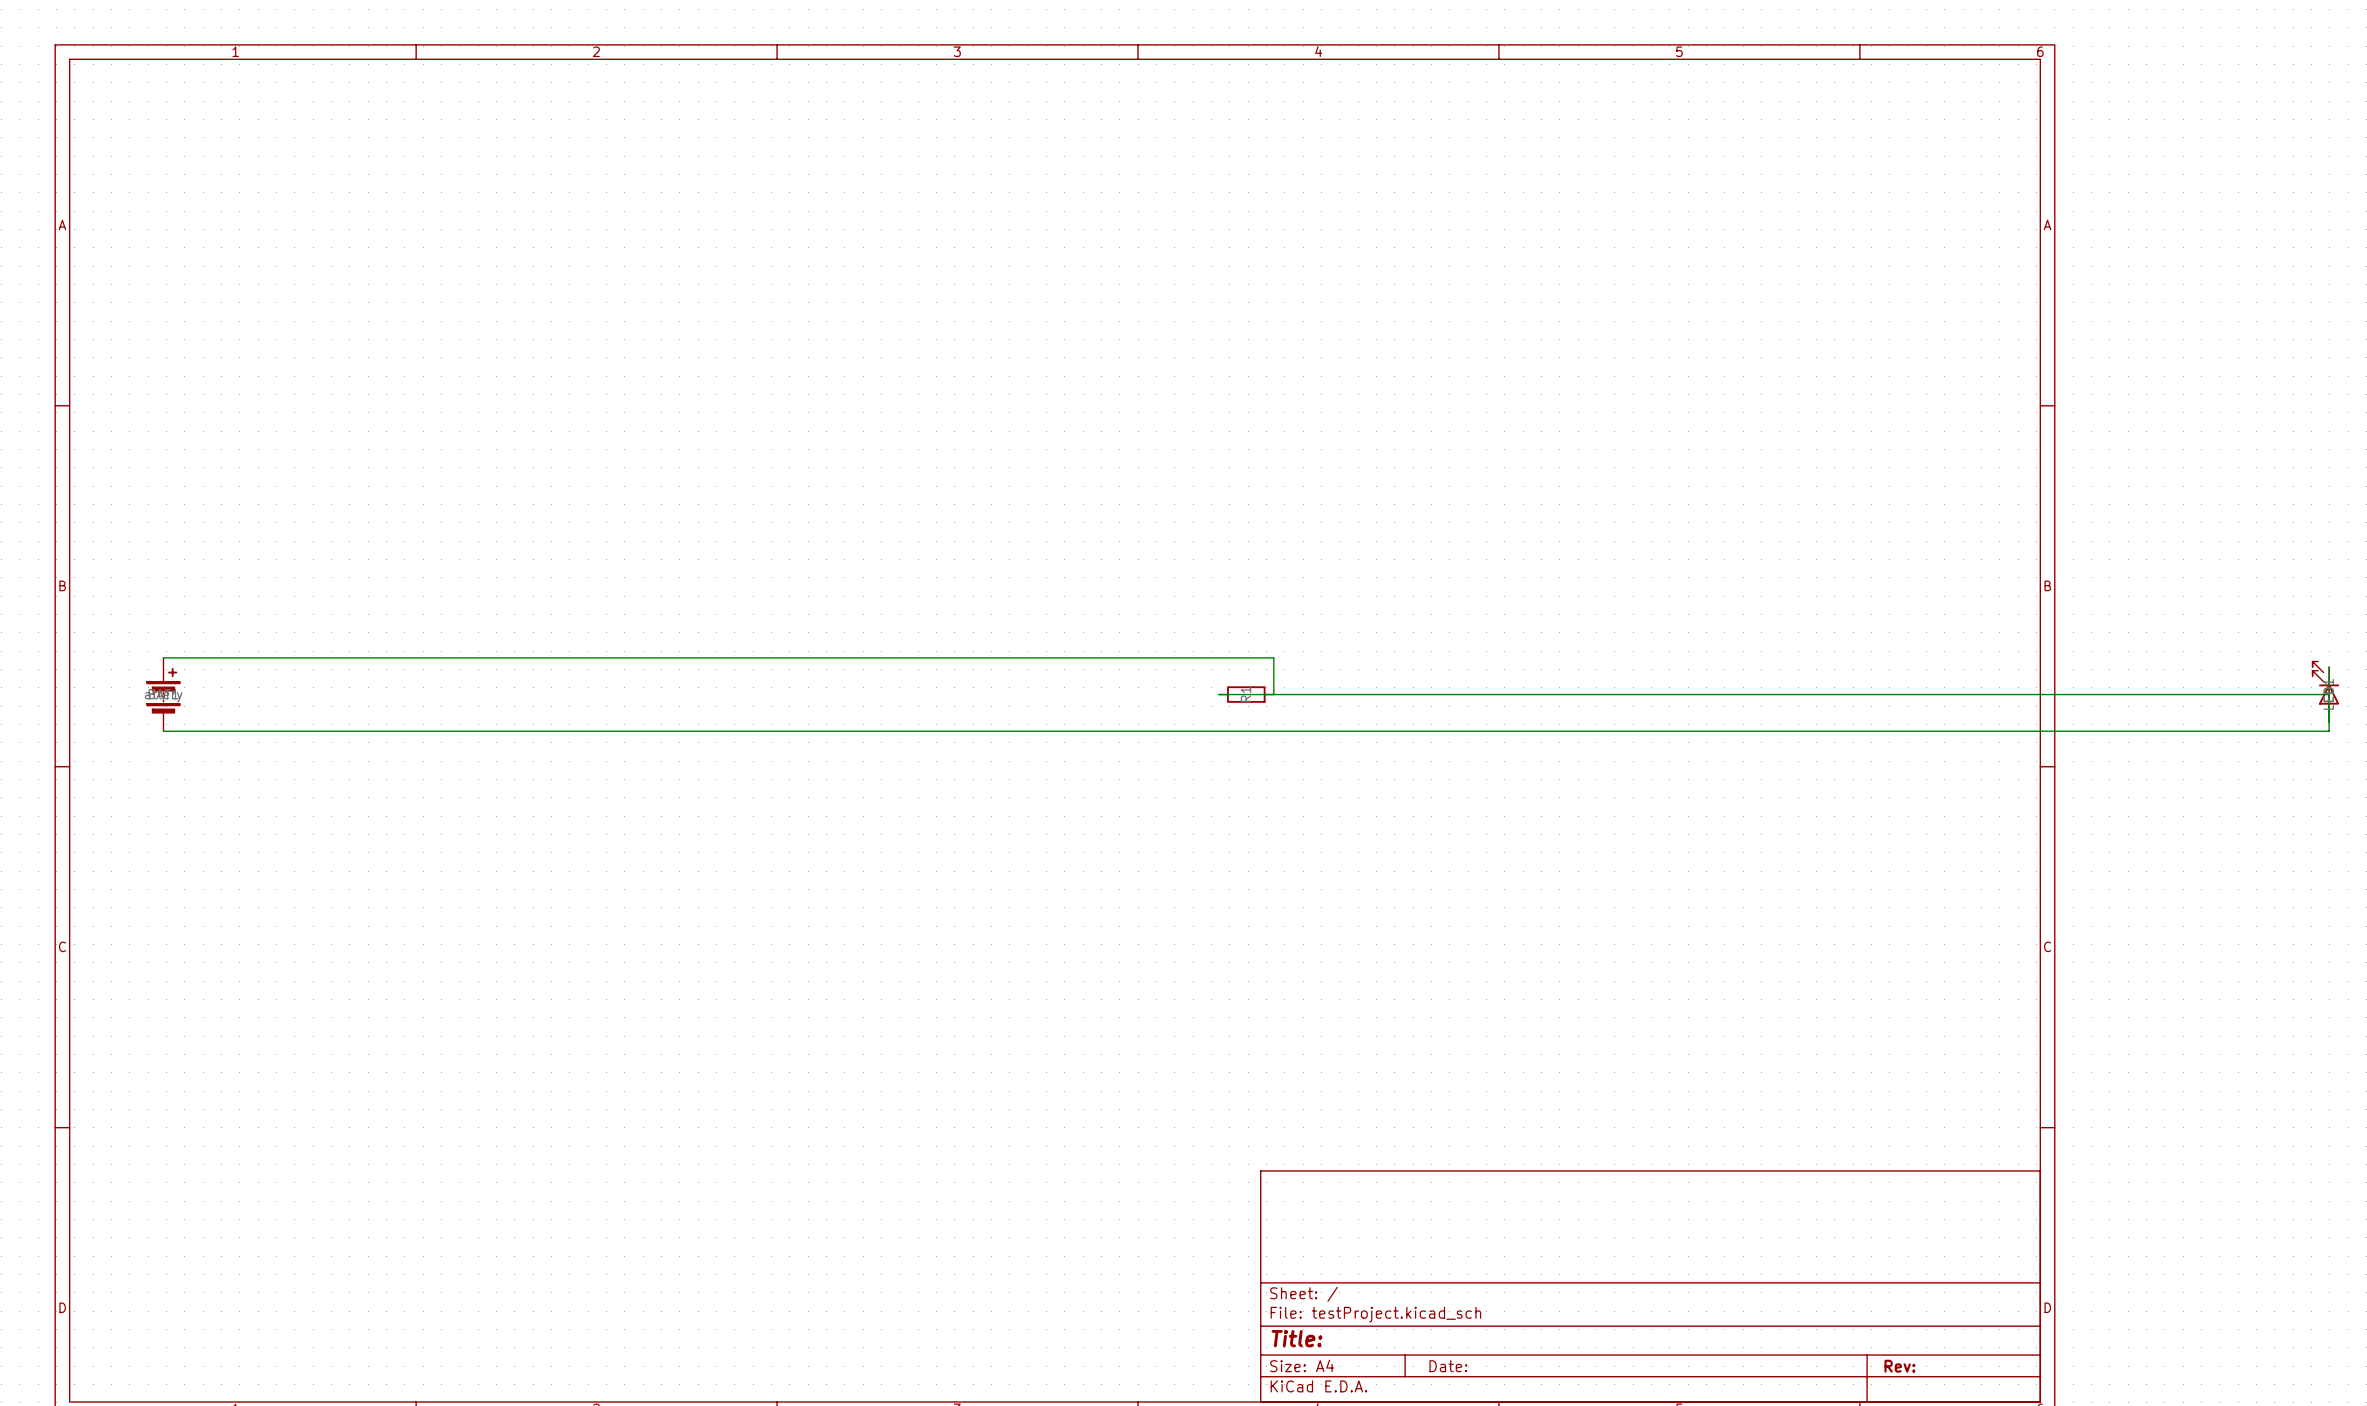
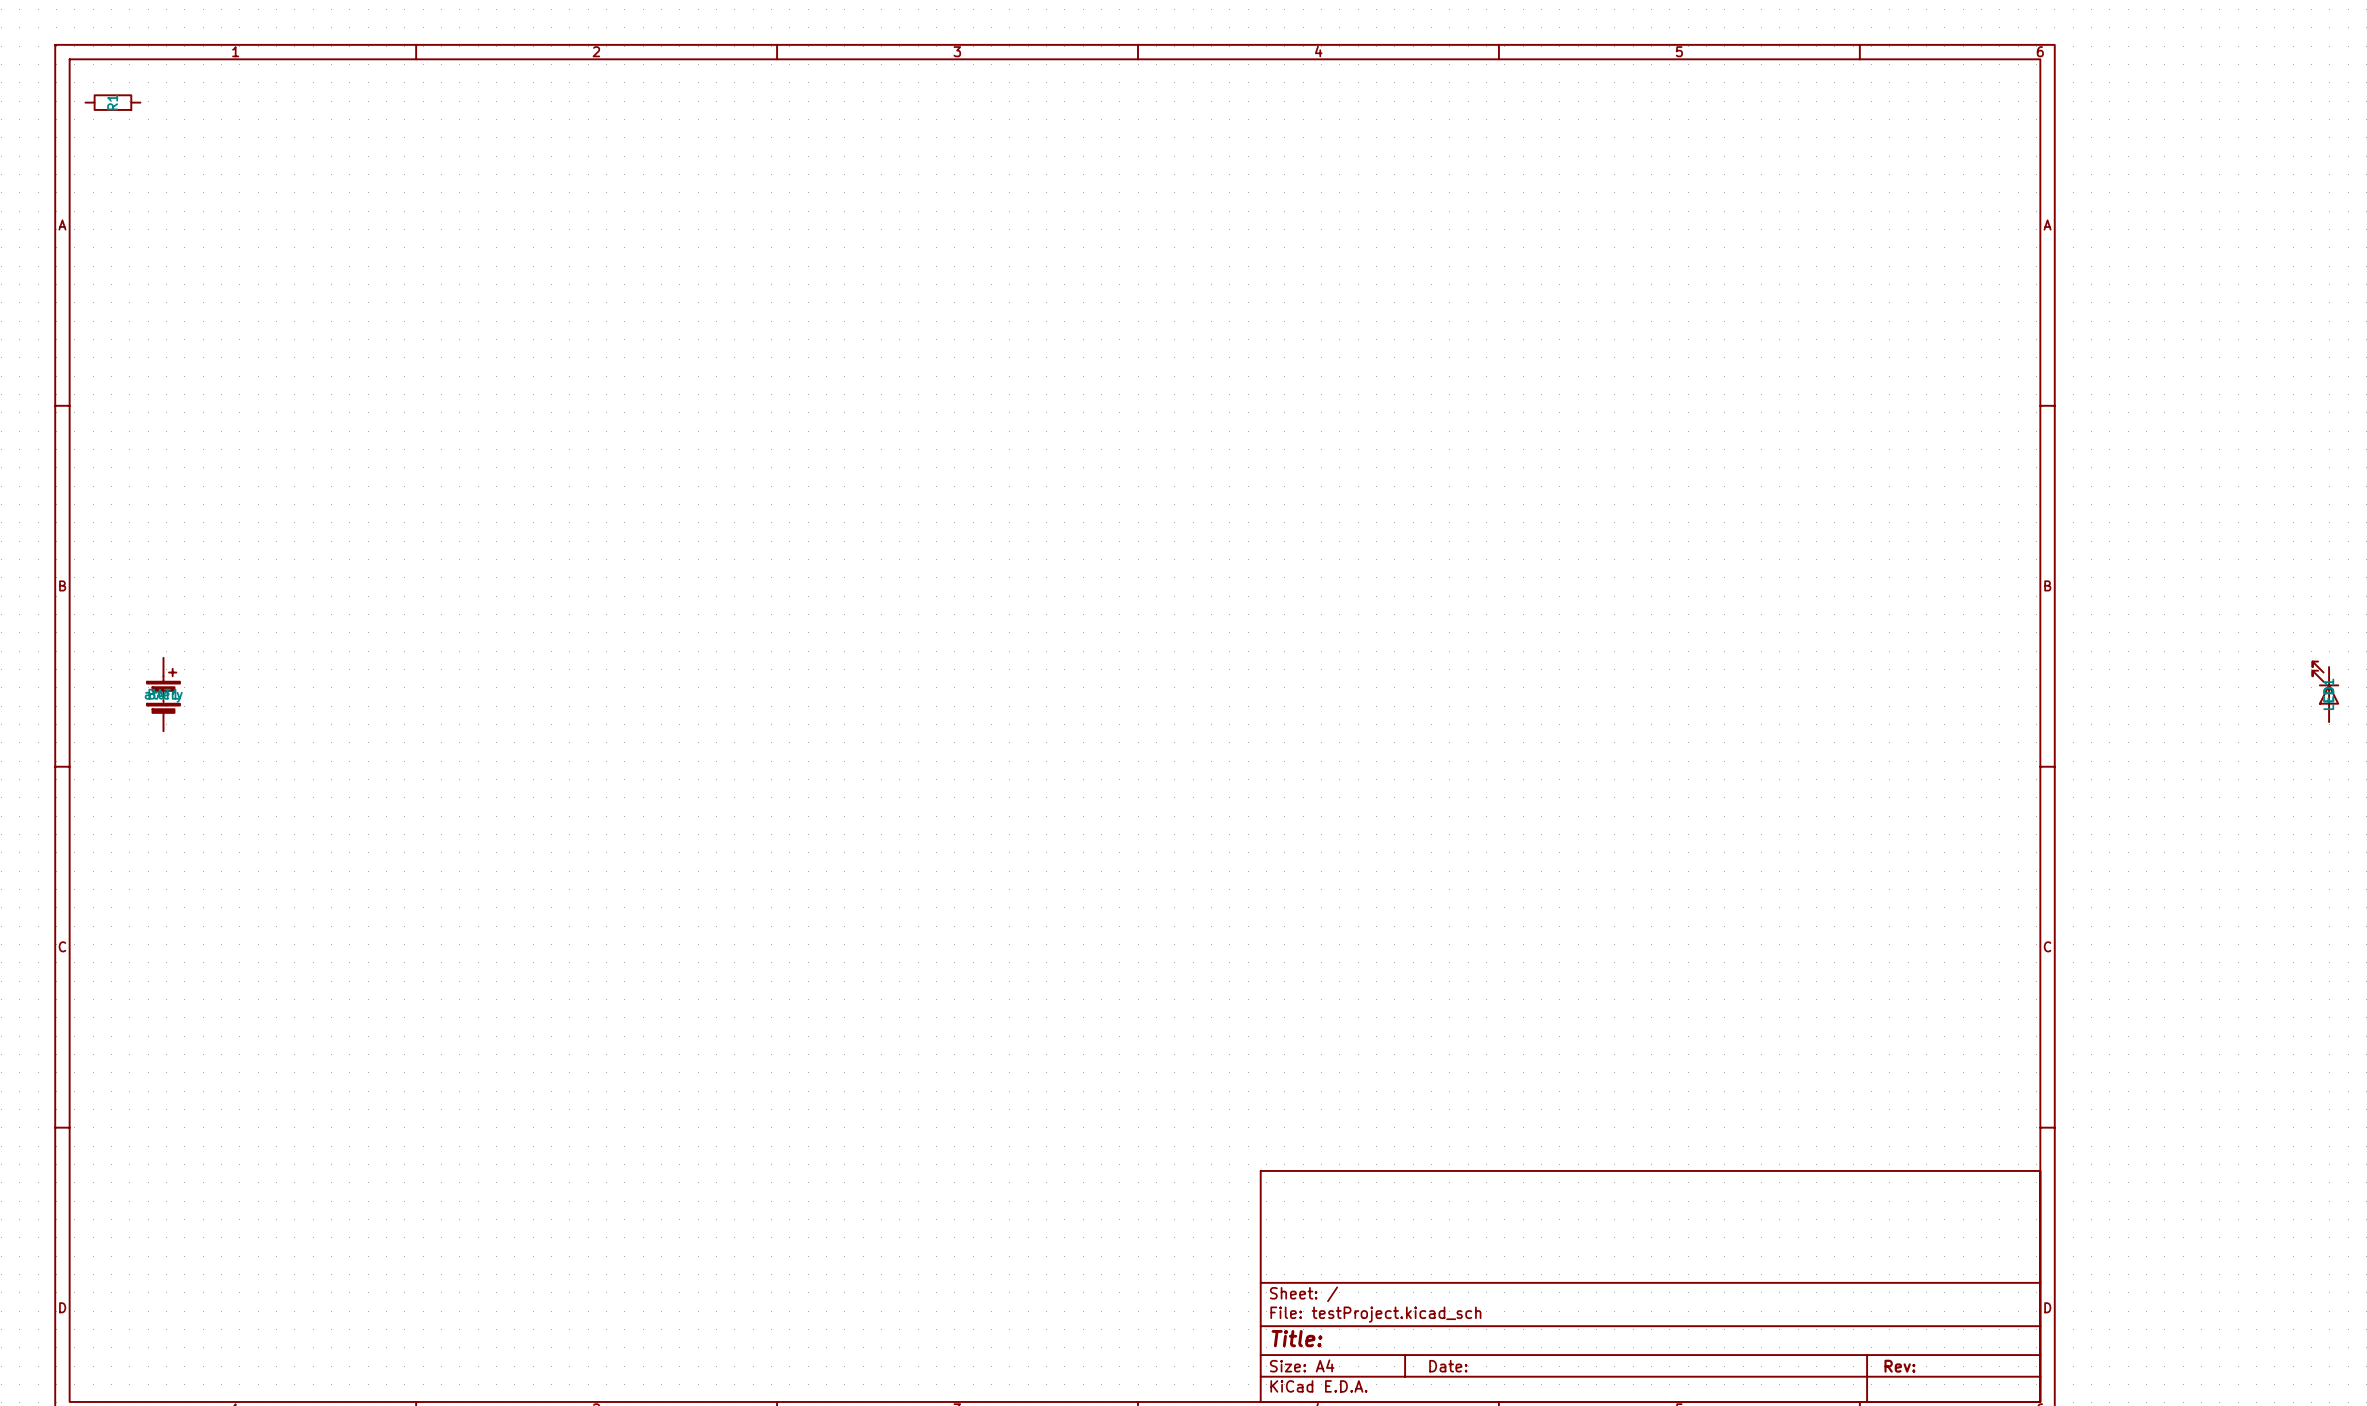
wire: (163, 657) (1273, 657) (1273, 694) -> none
wire: (2329, 667) (2329, 731) (163, 731) -> none
wire: (1218, 694) (2329, 694) -> none
R1 position: (1246, 694) -> (112, 102)

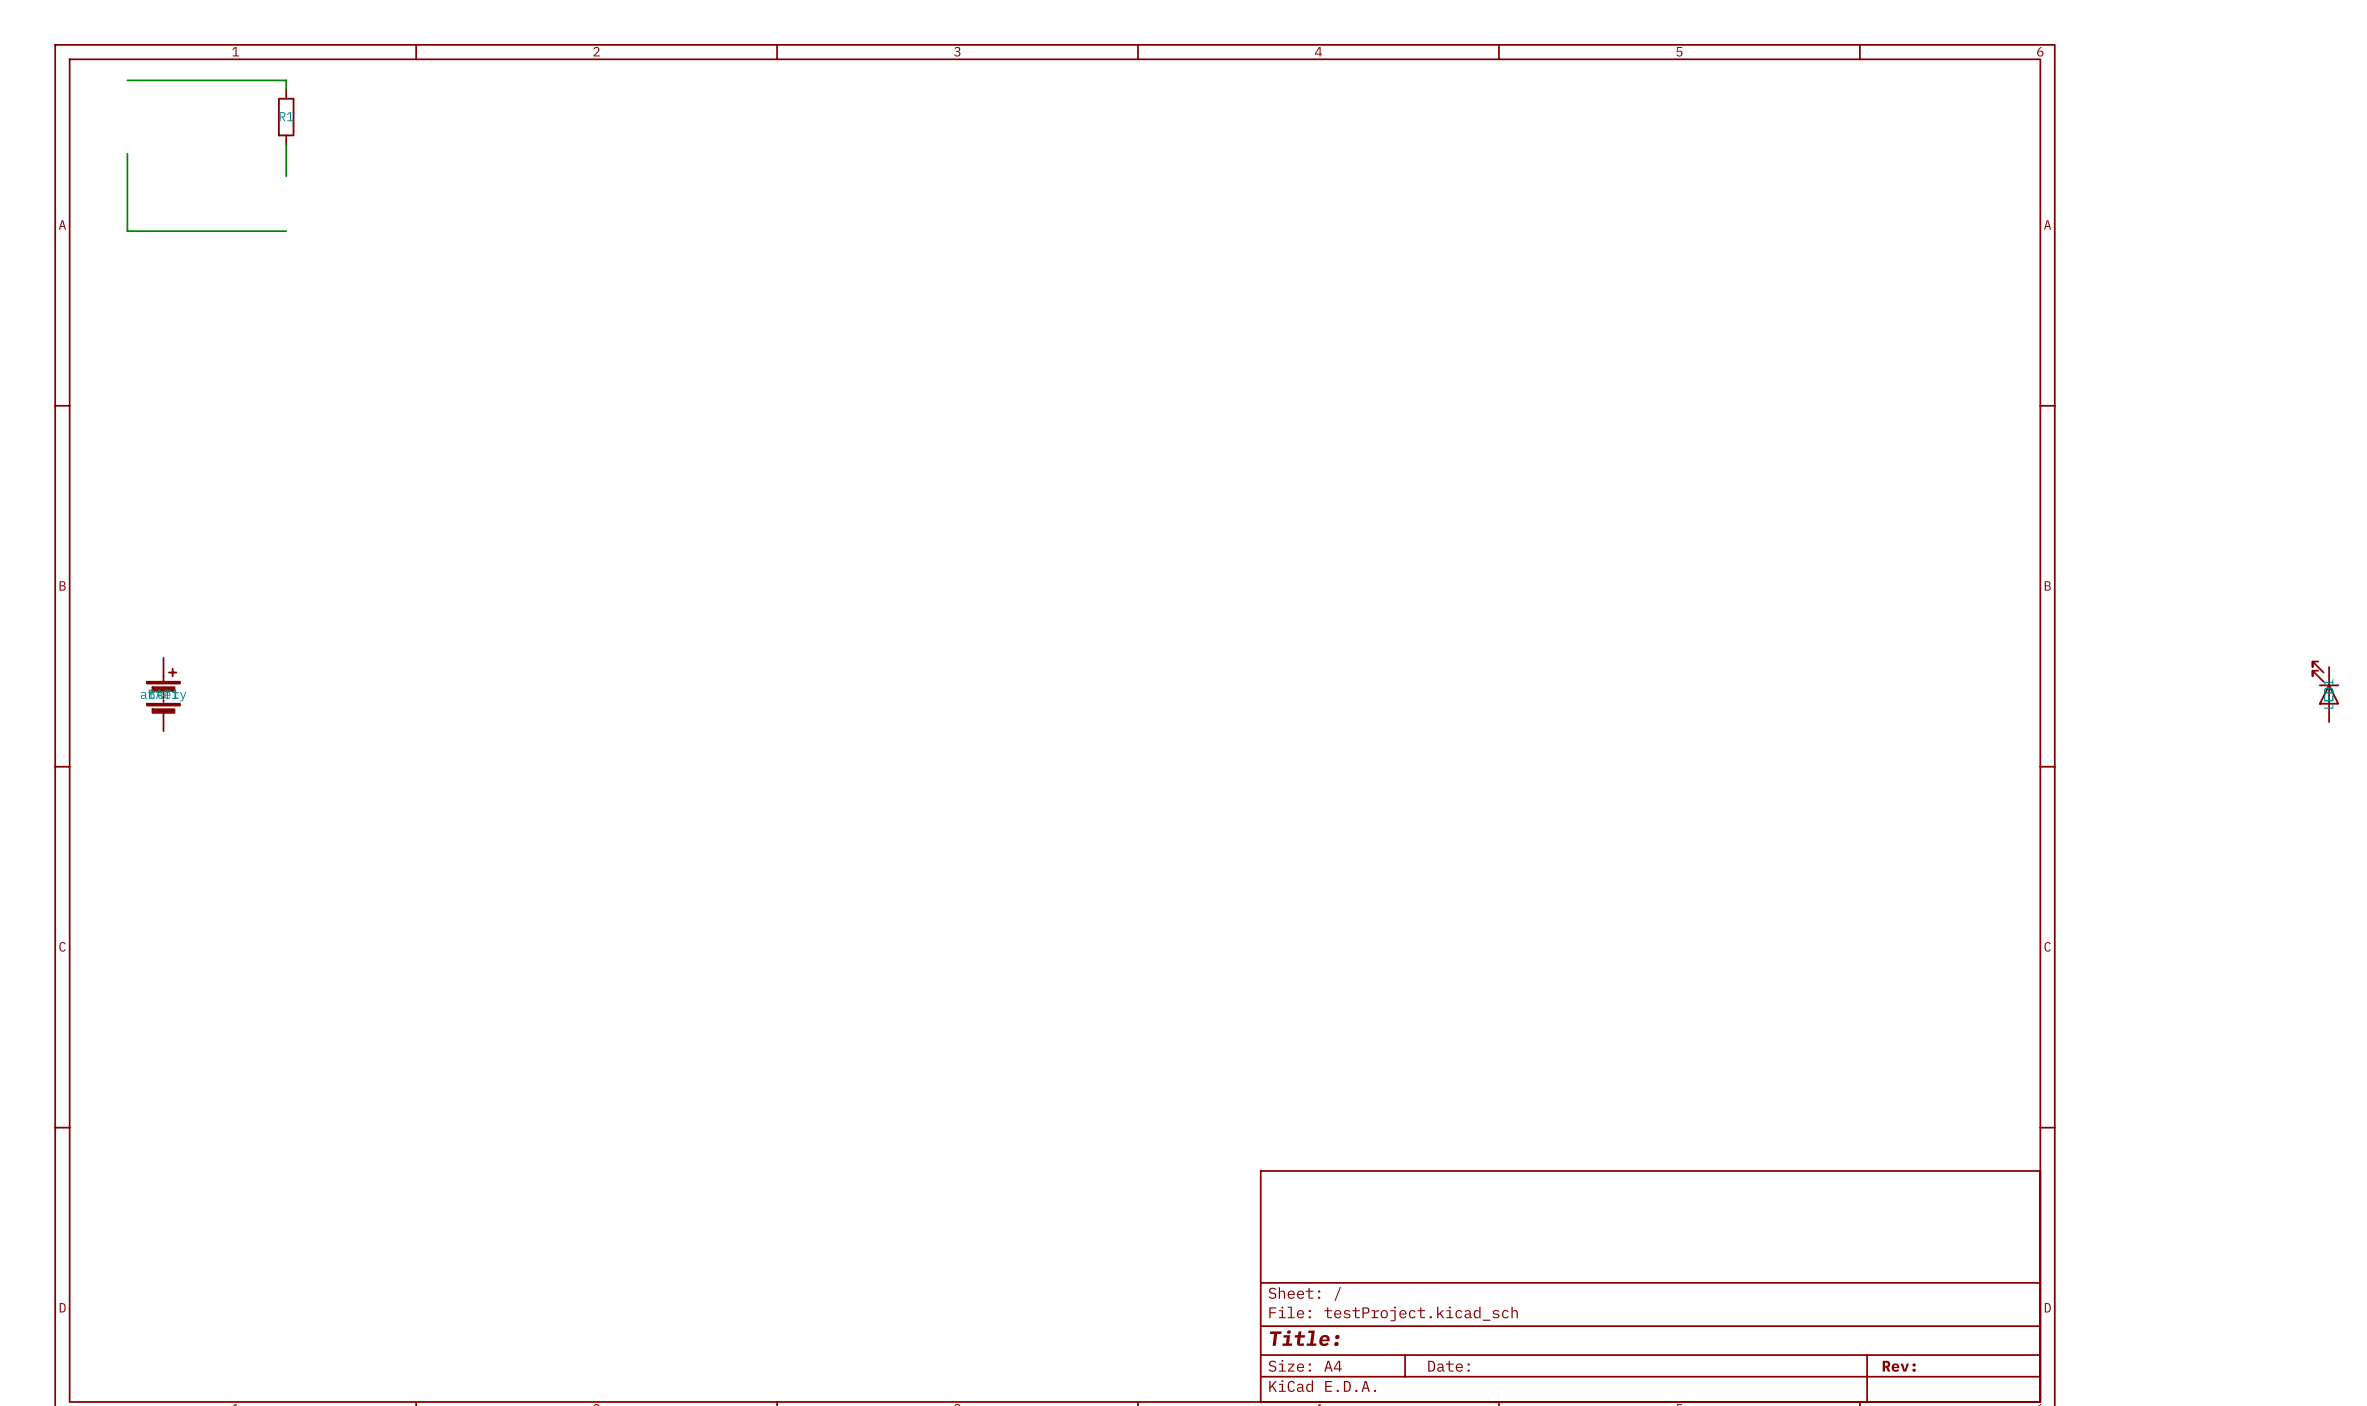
wire: none -> (127, 80) (286, 80) (286, 89)
R1 rotation: 0° (112, 102) -> 90° clockwise (286, 117)
R1 position: (112, 102) -> (286, 117)
wire: none -> (286, 144) (286, 176)
wire: none -> (127, 153) (127, 231) (286, 231)

